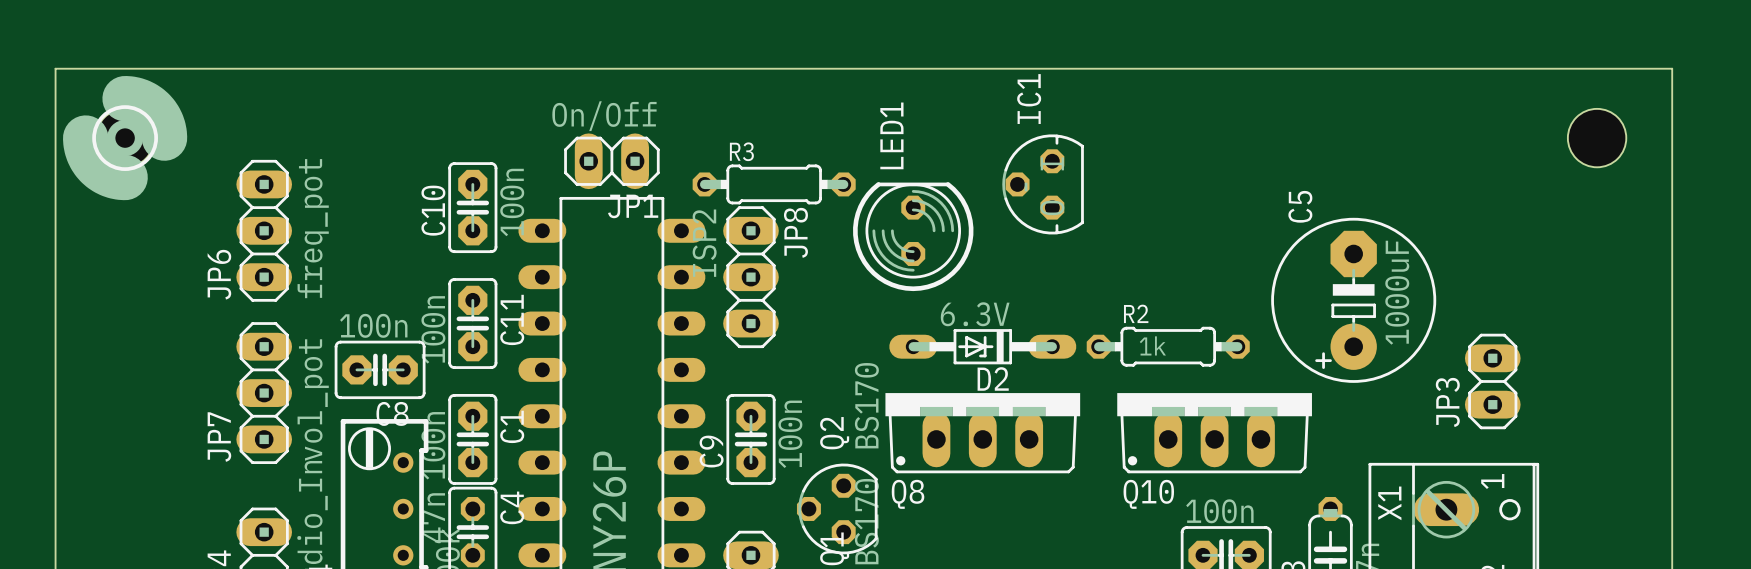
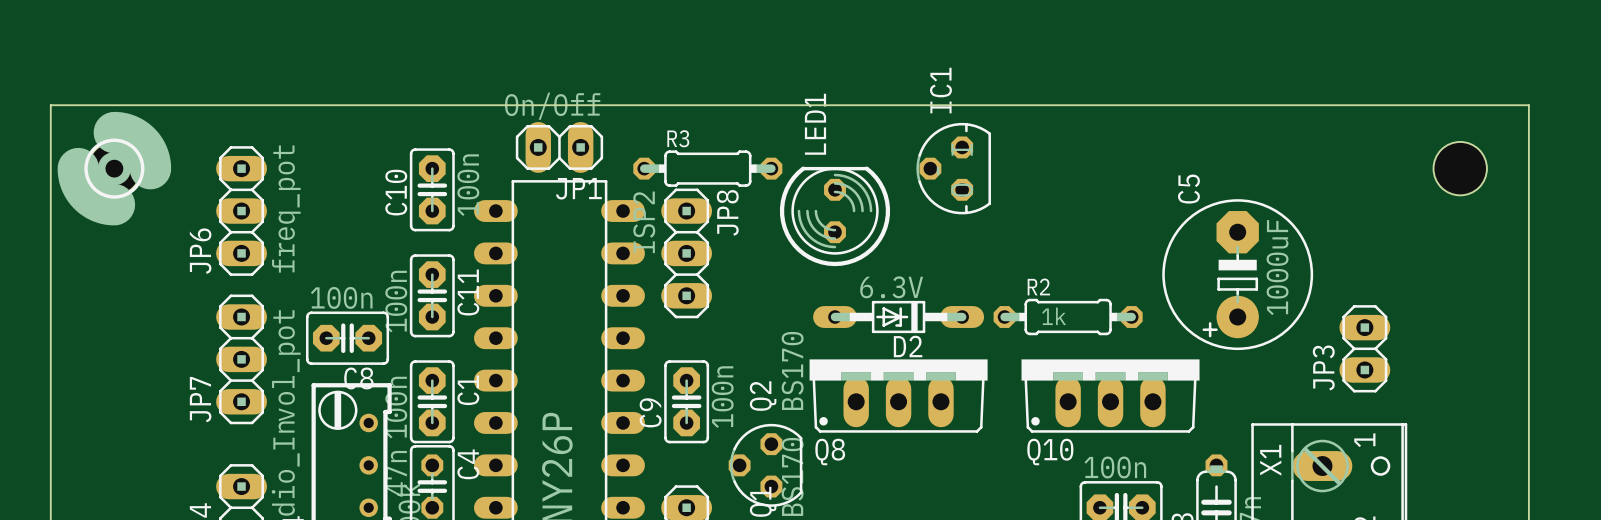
board edge: (55, 115) (55, 68) (1672, 68) (1672, 115) -> (50, 105) (1528, 105)
part position: (125, 138) -> (114, 168)
part position: (1597, 138) -> (1460, 168)

